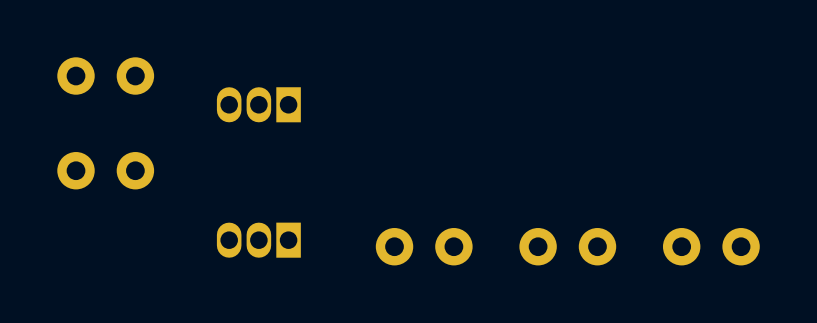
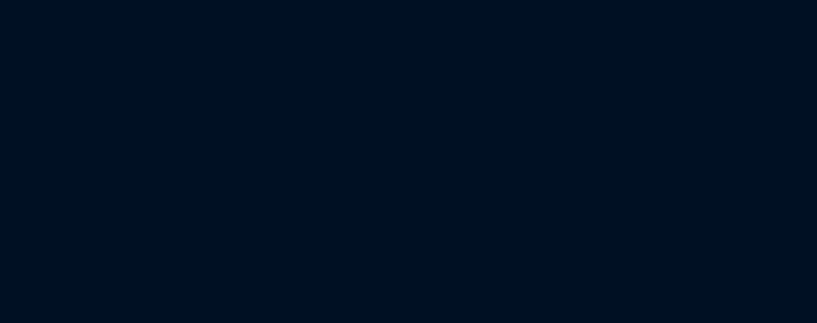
part: (105, 76) -> none
part: (258, 104) -> none
part: (105, 170) -> none
part: (258, 240) -> none
part: (424, 246) -> none
part: (567, 246) -> none
part: (711, 246) -> none

